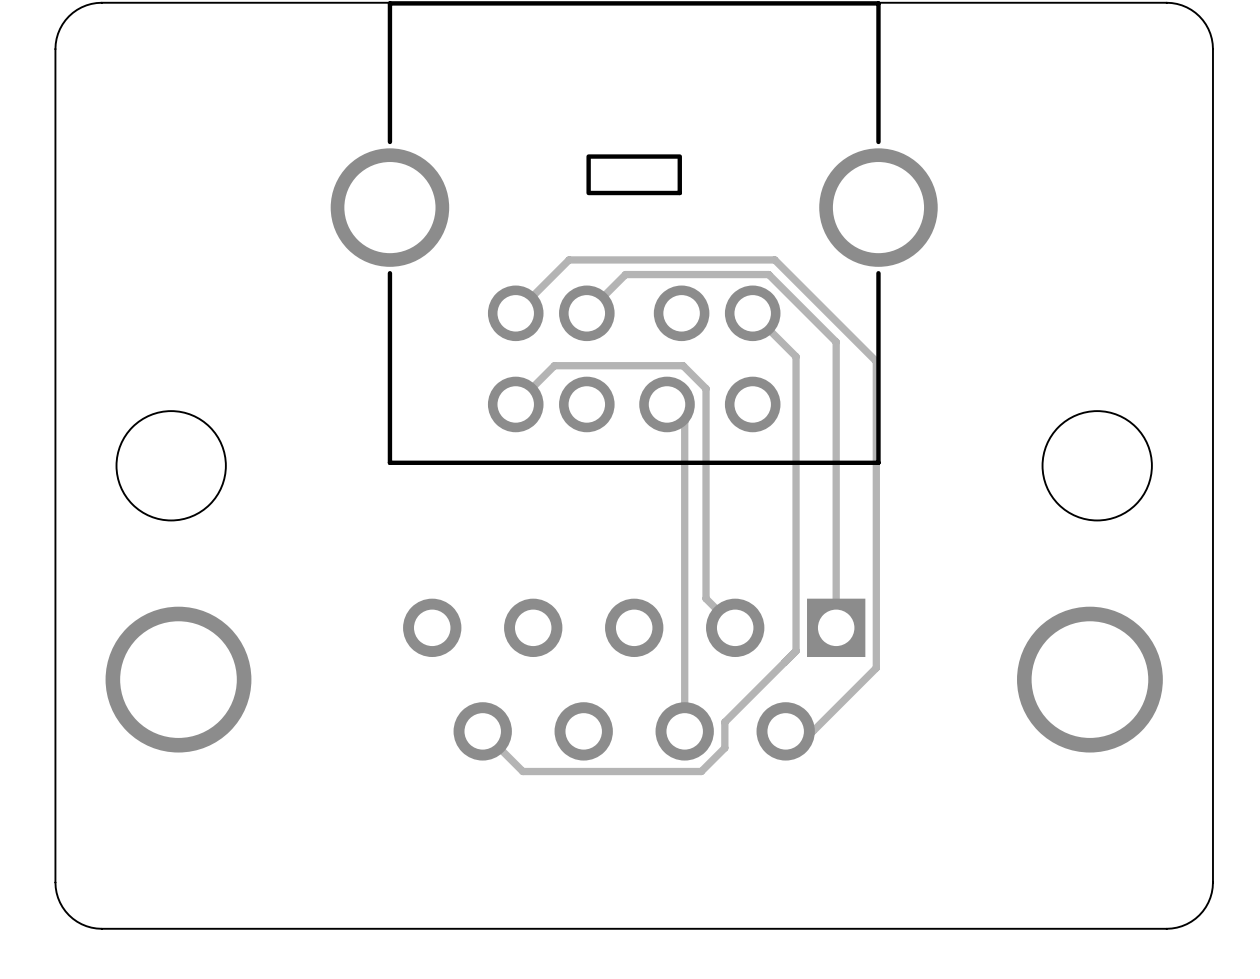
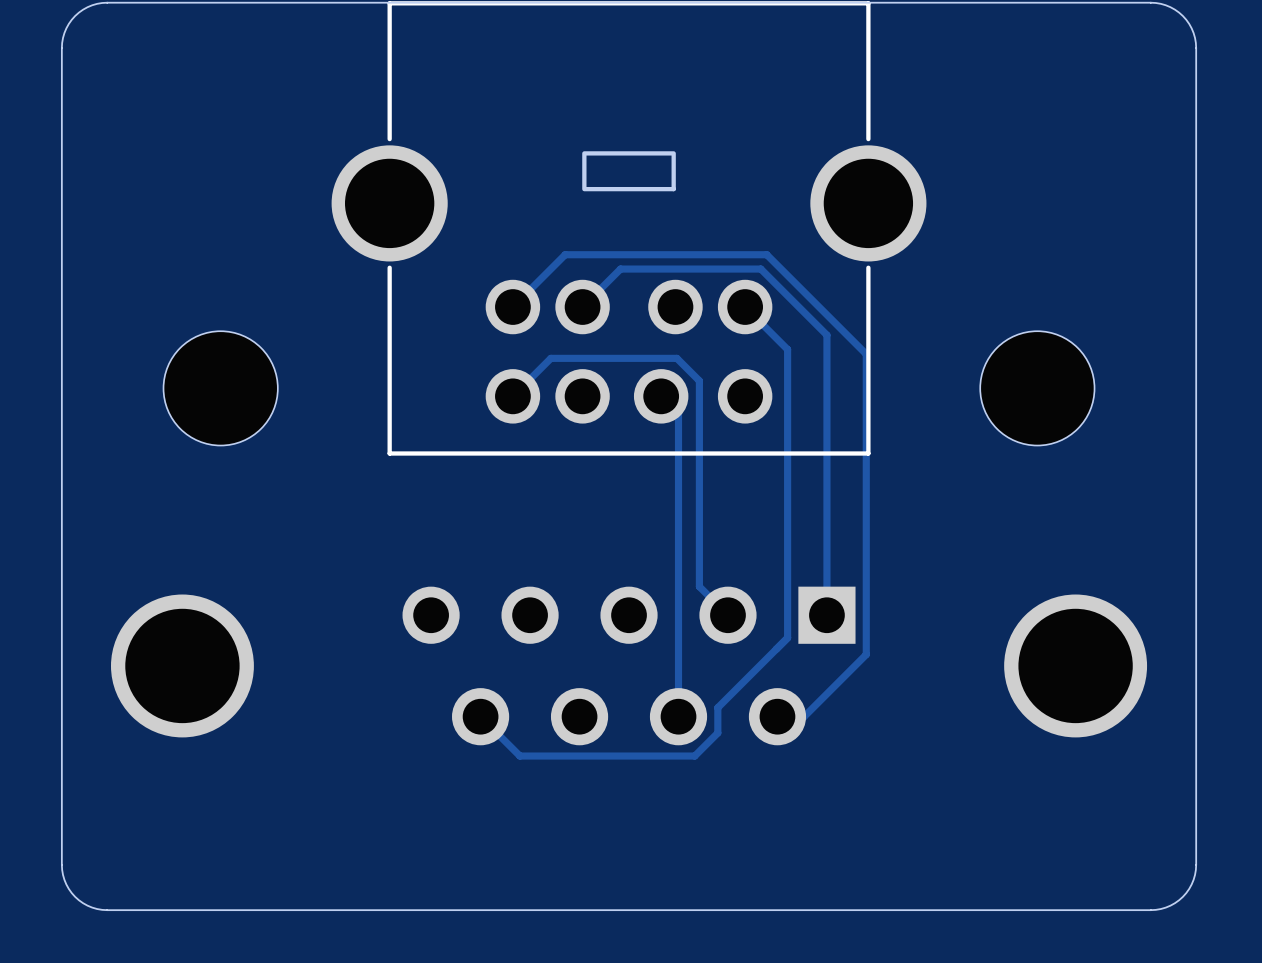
part: none -> (220, 388)
part: none -> (1037, 388)
round board edge: [115, 410, 227, 522] -> none
round board edge: [1041, 410, 1153, 522] -> none

